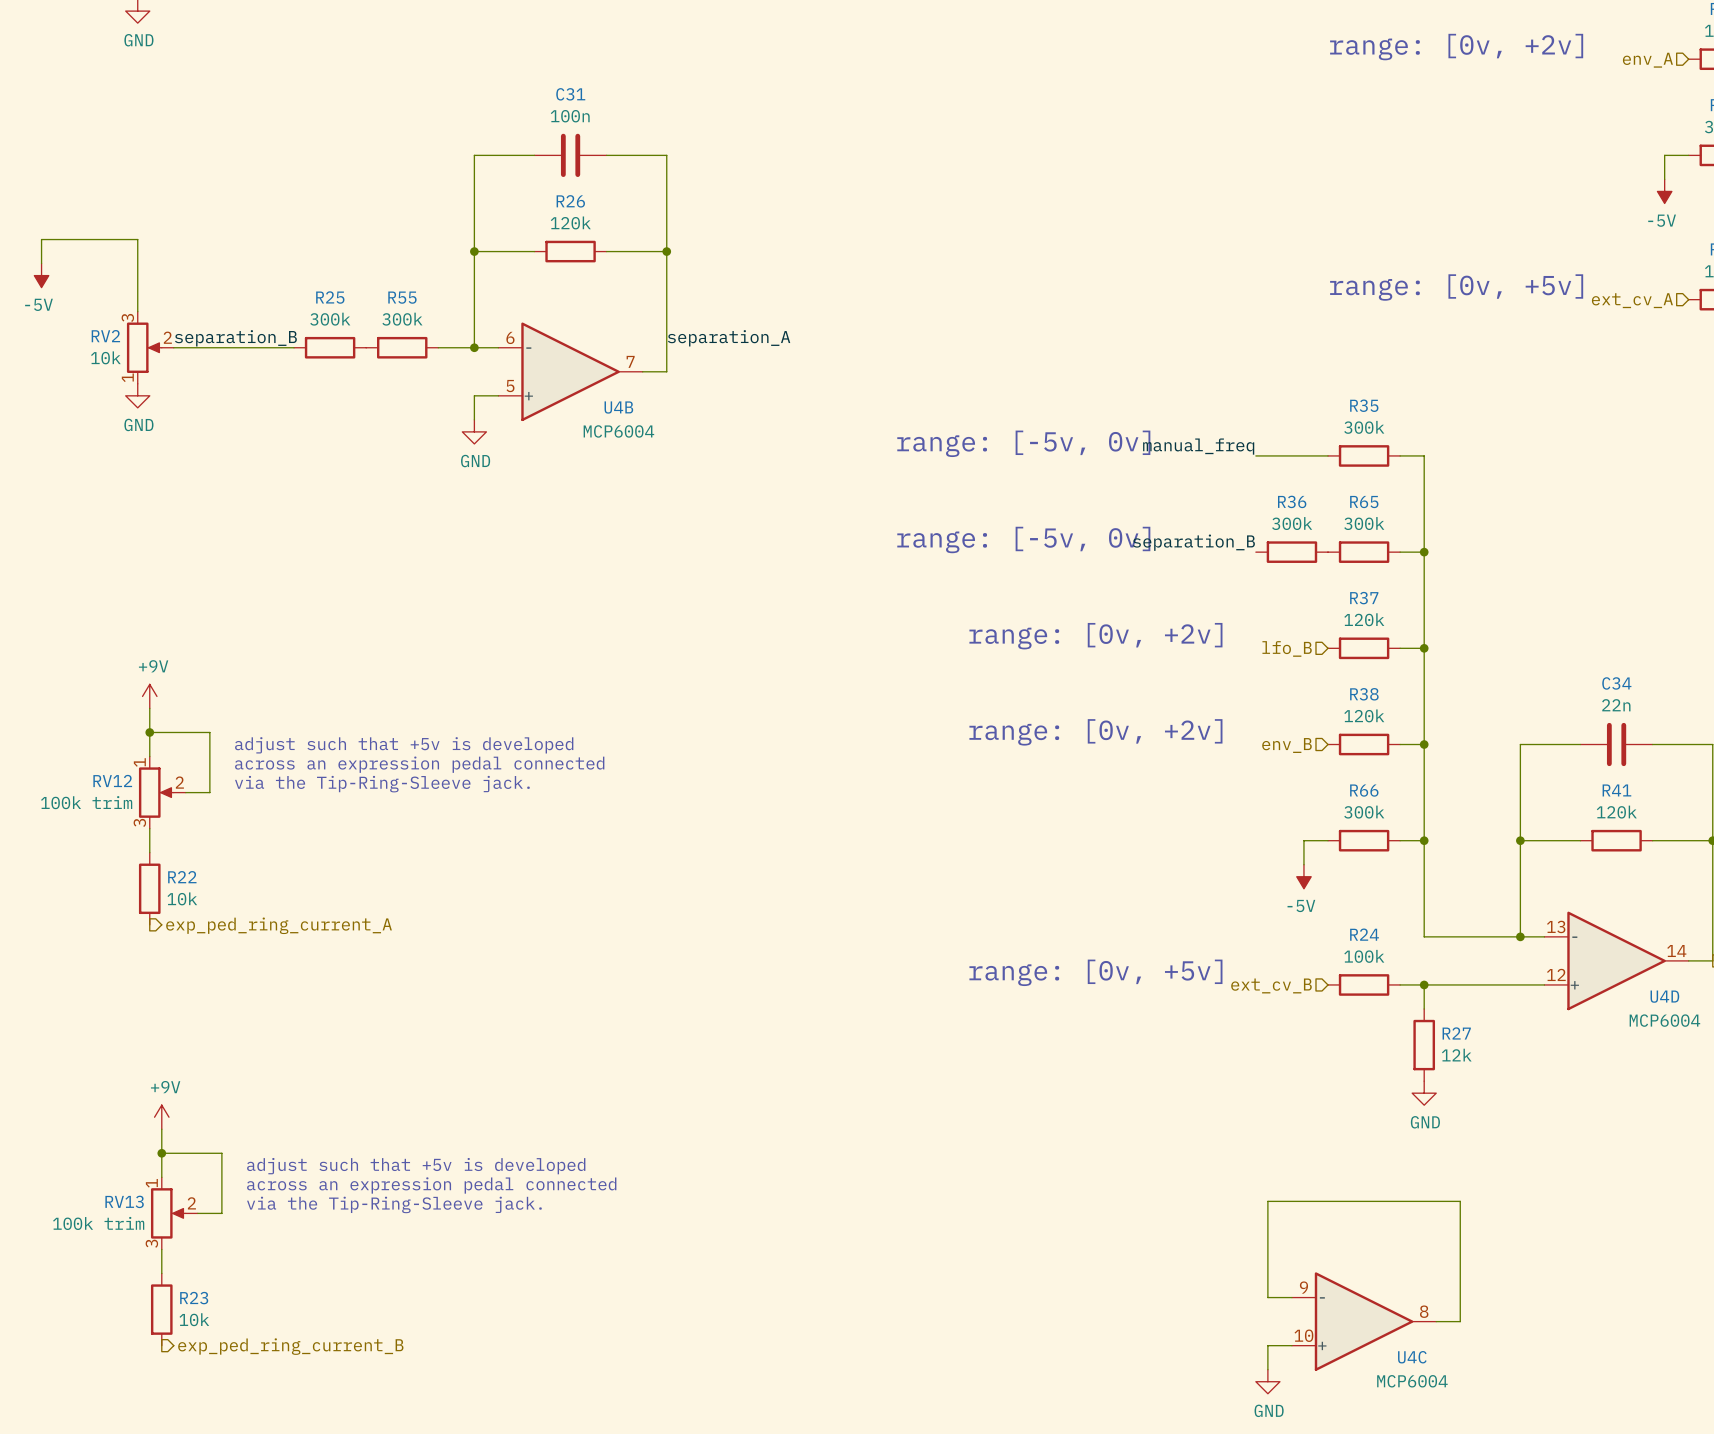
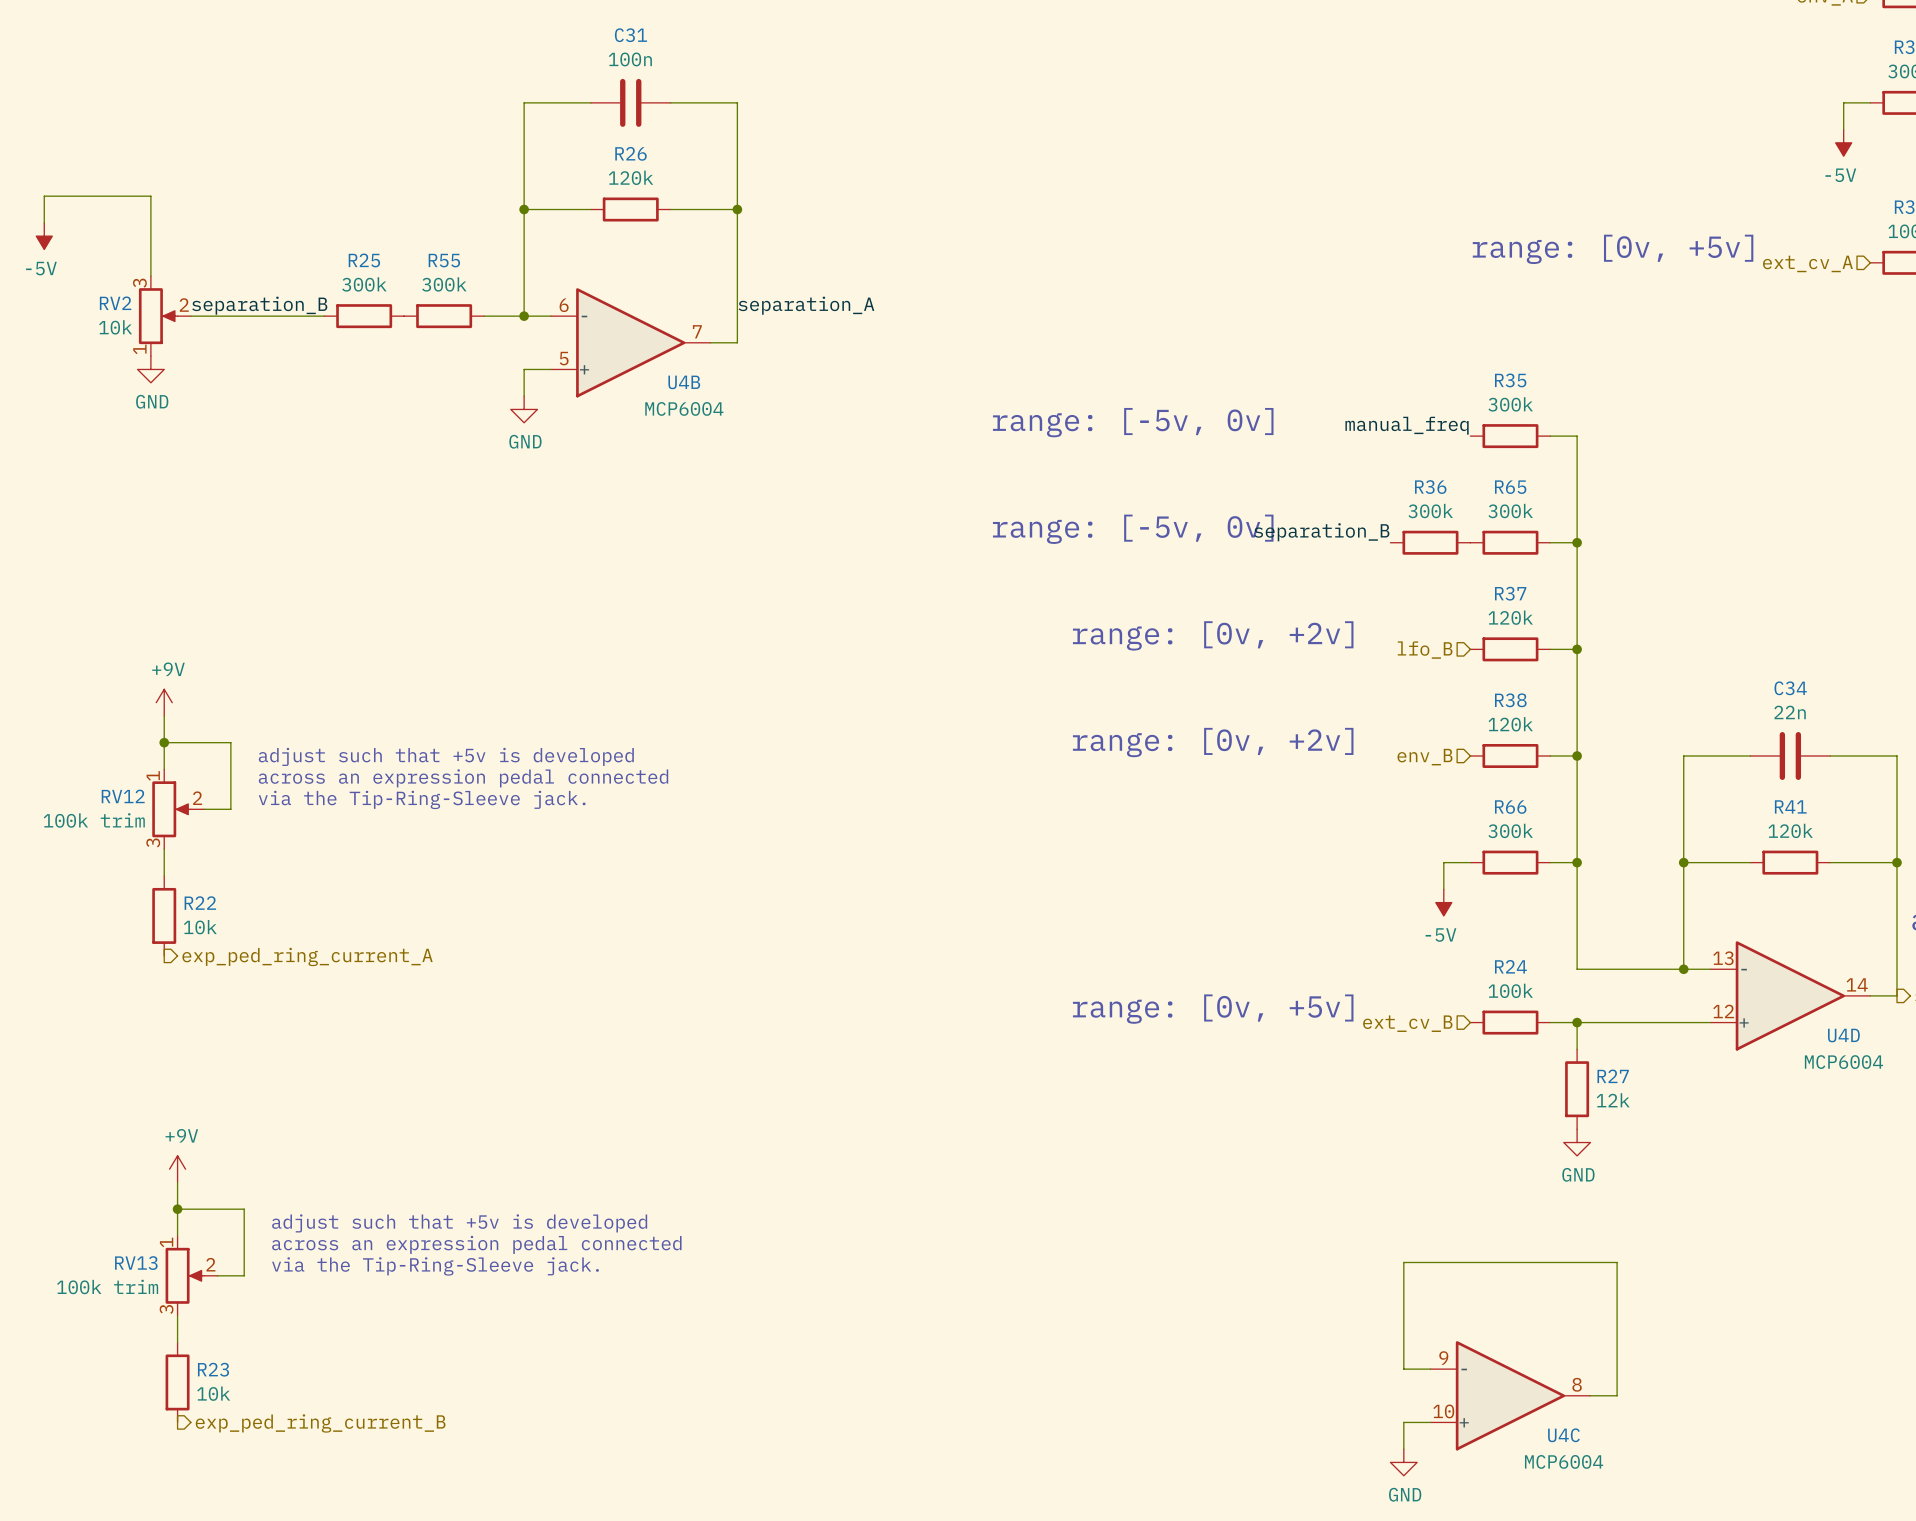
label position: manual_freq (1198, 446) -> manual_freq (1407, 425)
wire: (1255, 455) (1328, 455) -> none

